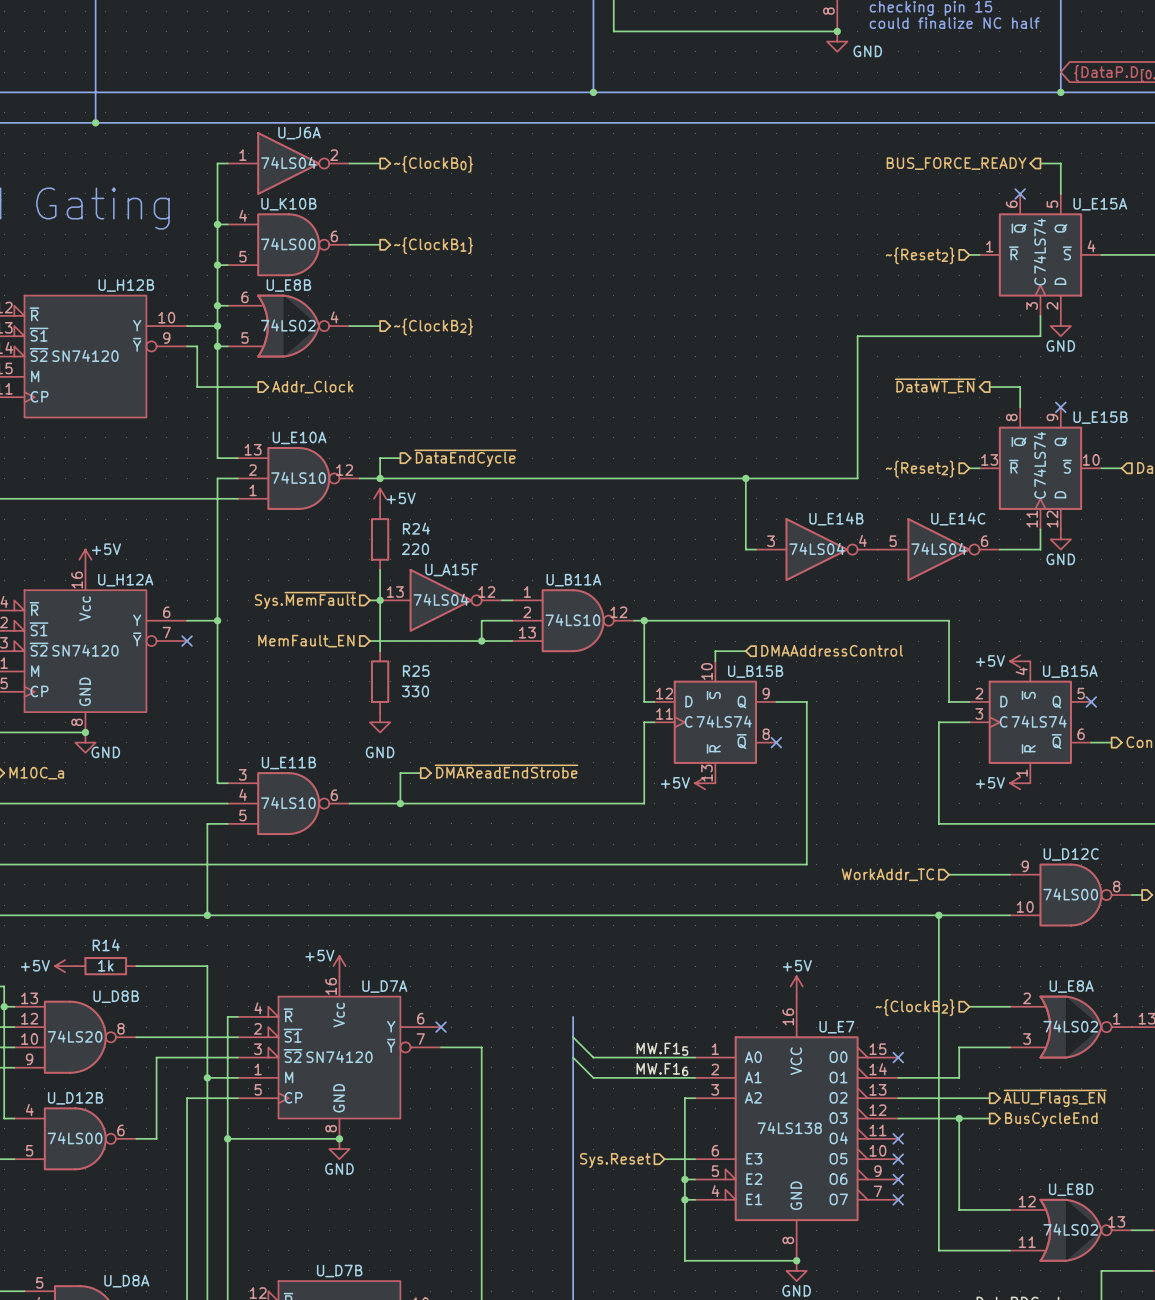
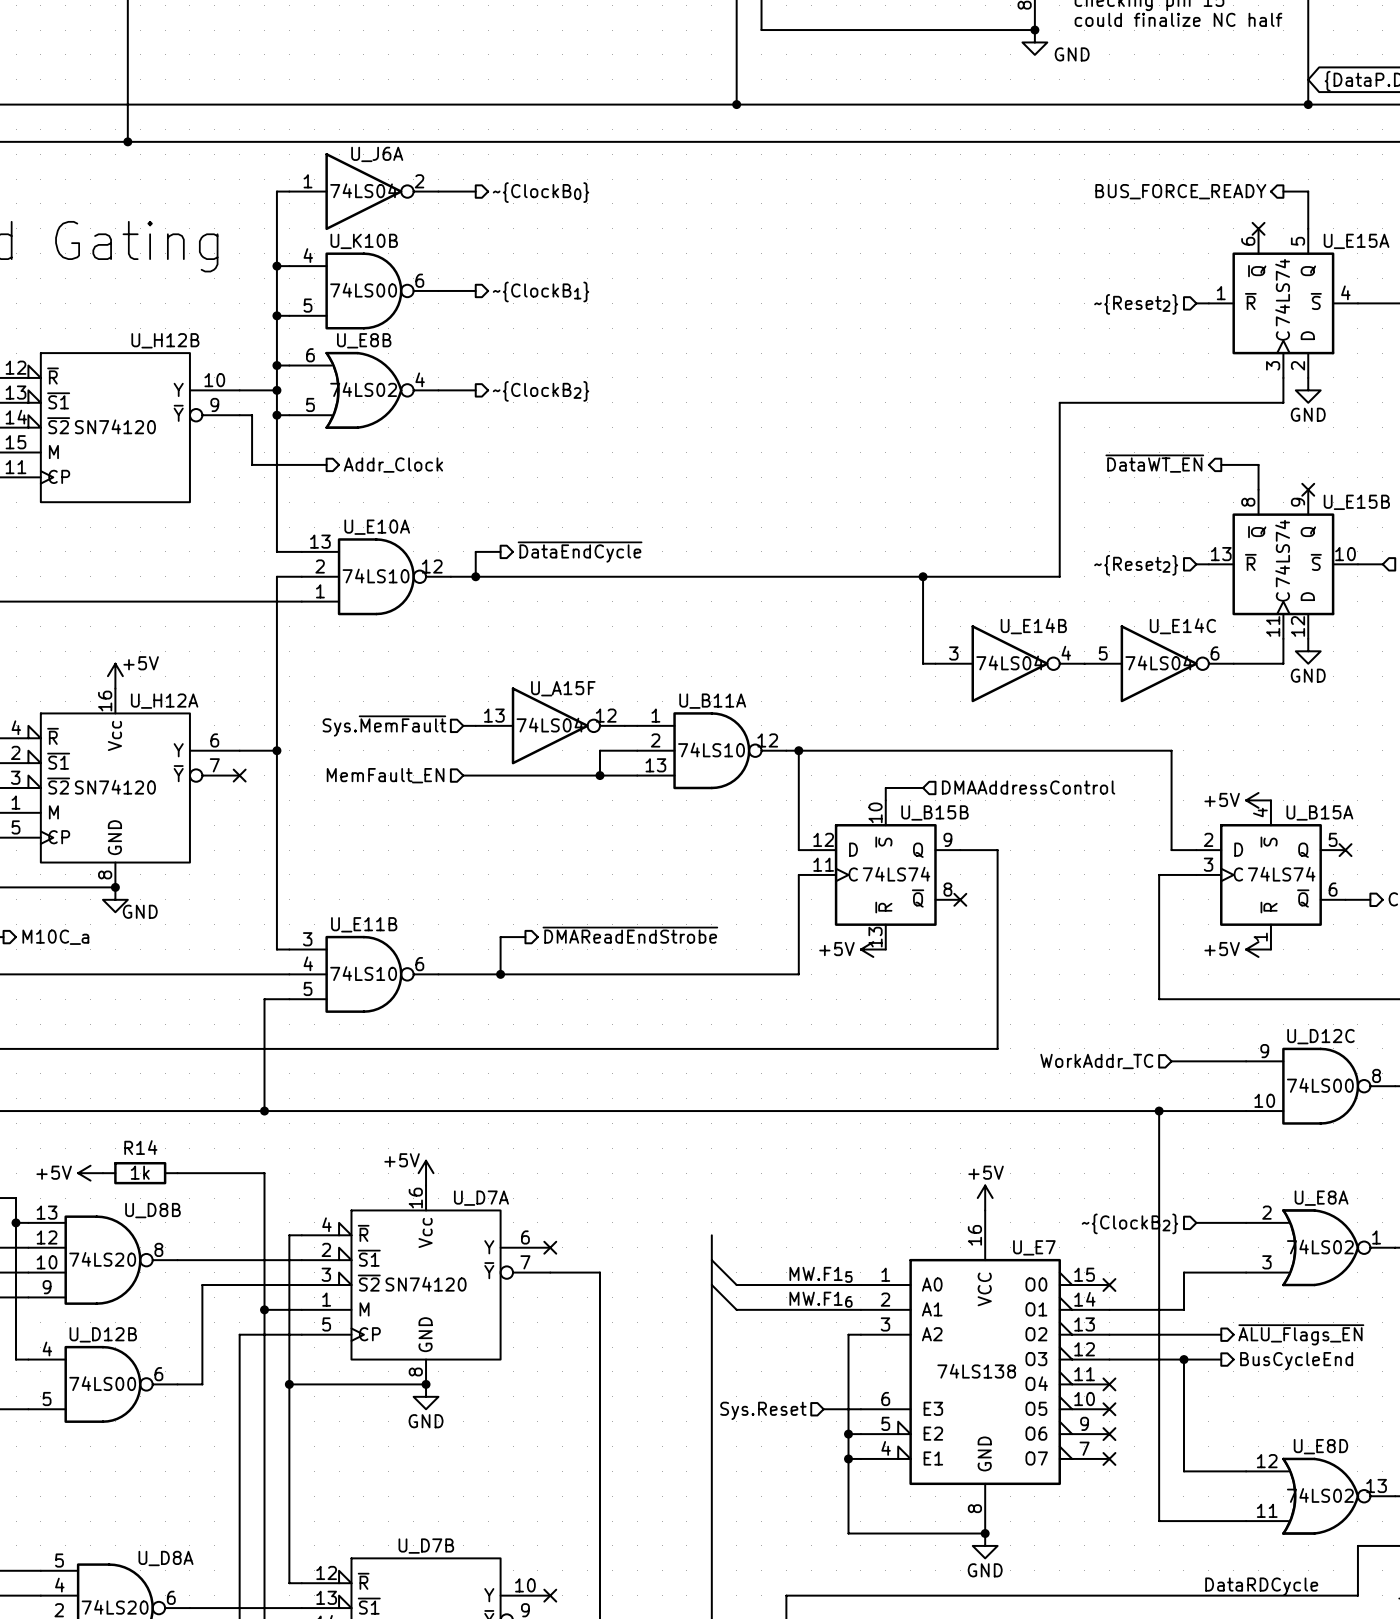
power symbol: +5V (380, 498) -> none
R24: 220 (380, 539) -> none
wire: (380, 569) (380, 651) -> none
junction: (380, 600) -> none
R25: 330 (380, 681) -> none
power symbol: GND (380, 722) -> none

